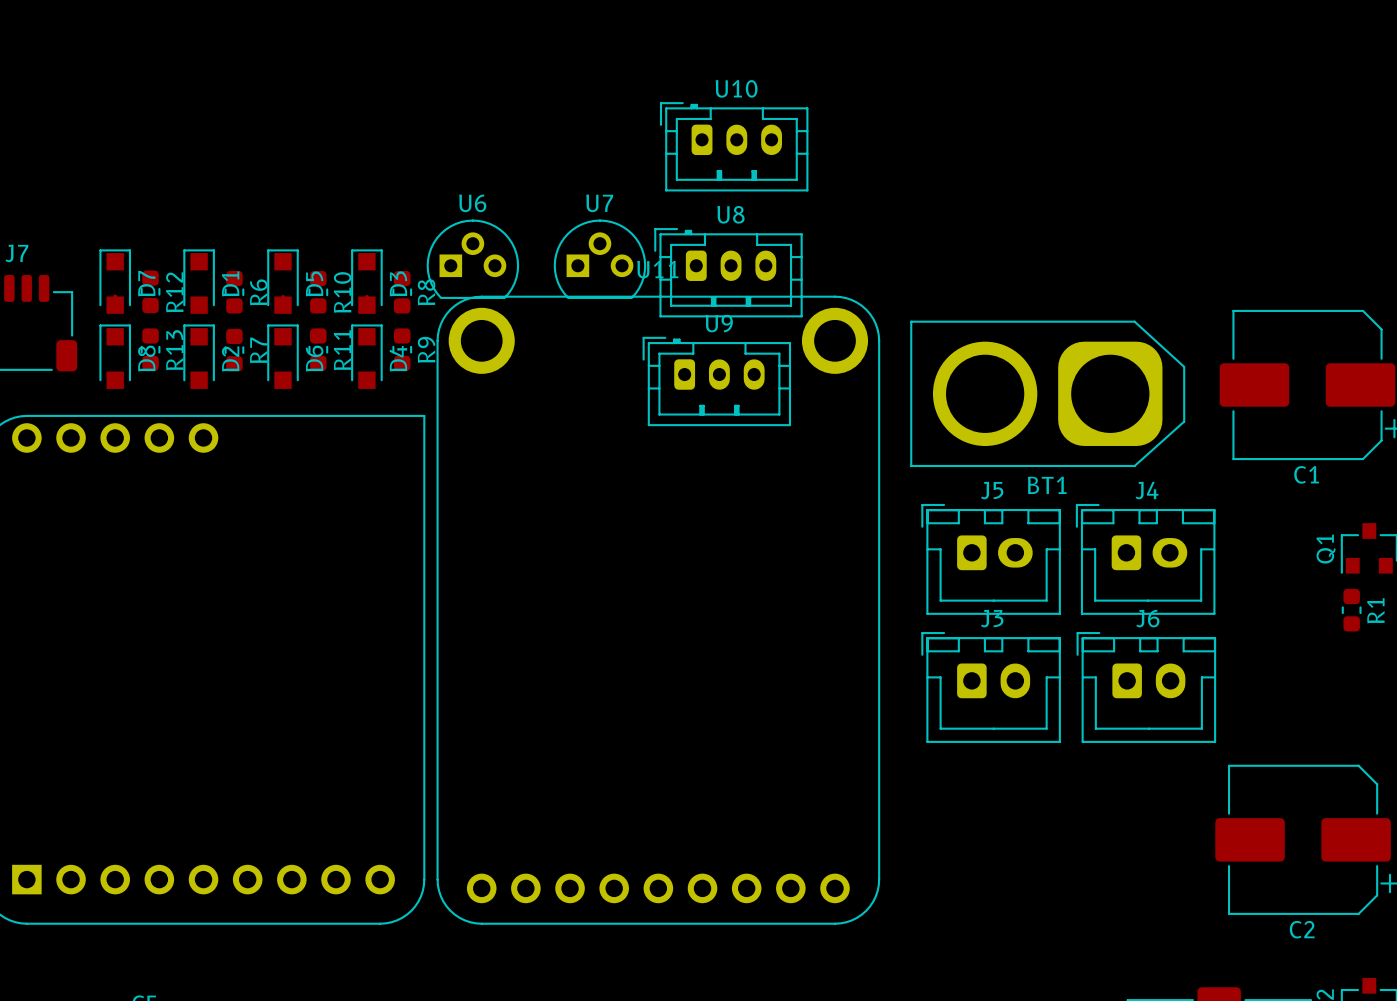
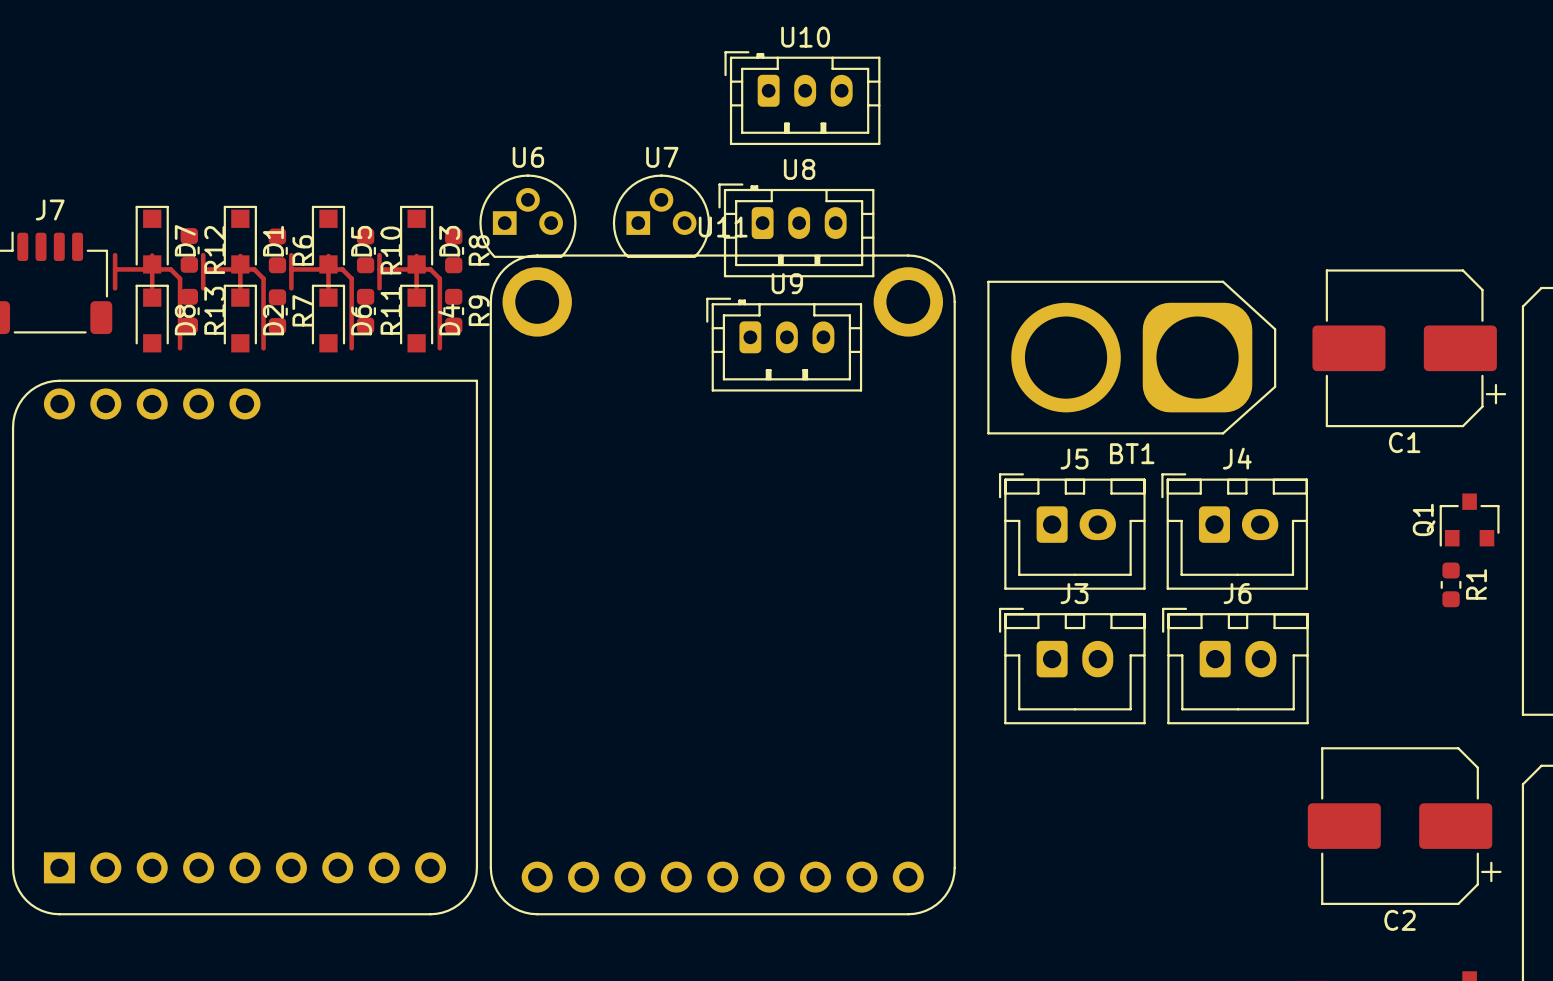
track: none -> (115, 255) (115, 288)
track: none -> (203, 255) (203, 288)
track: none -> (291, 255) (291, 288)
track: none -> (379, 255) (379, 288)
track: none -> (240, 256) (240, 288)
track: none -> (115, 269) (170, 269) (180, 278) (180, 348)
track: none -> (152, 269) (152, 287)
track: none -> (203, 269) (254, 269) (263, 278) (263, 348)
track: none -> (291, 269) (342, 269) (351, 278) (351, 348)
track: none -> (328, 269) (328, 287)
track: none -> (379, 269) (430, 269) (439, 278) (439, 348)
track: none -> (416, 269) (416, 287)

